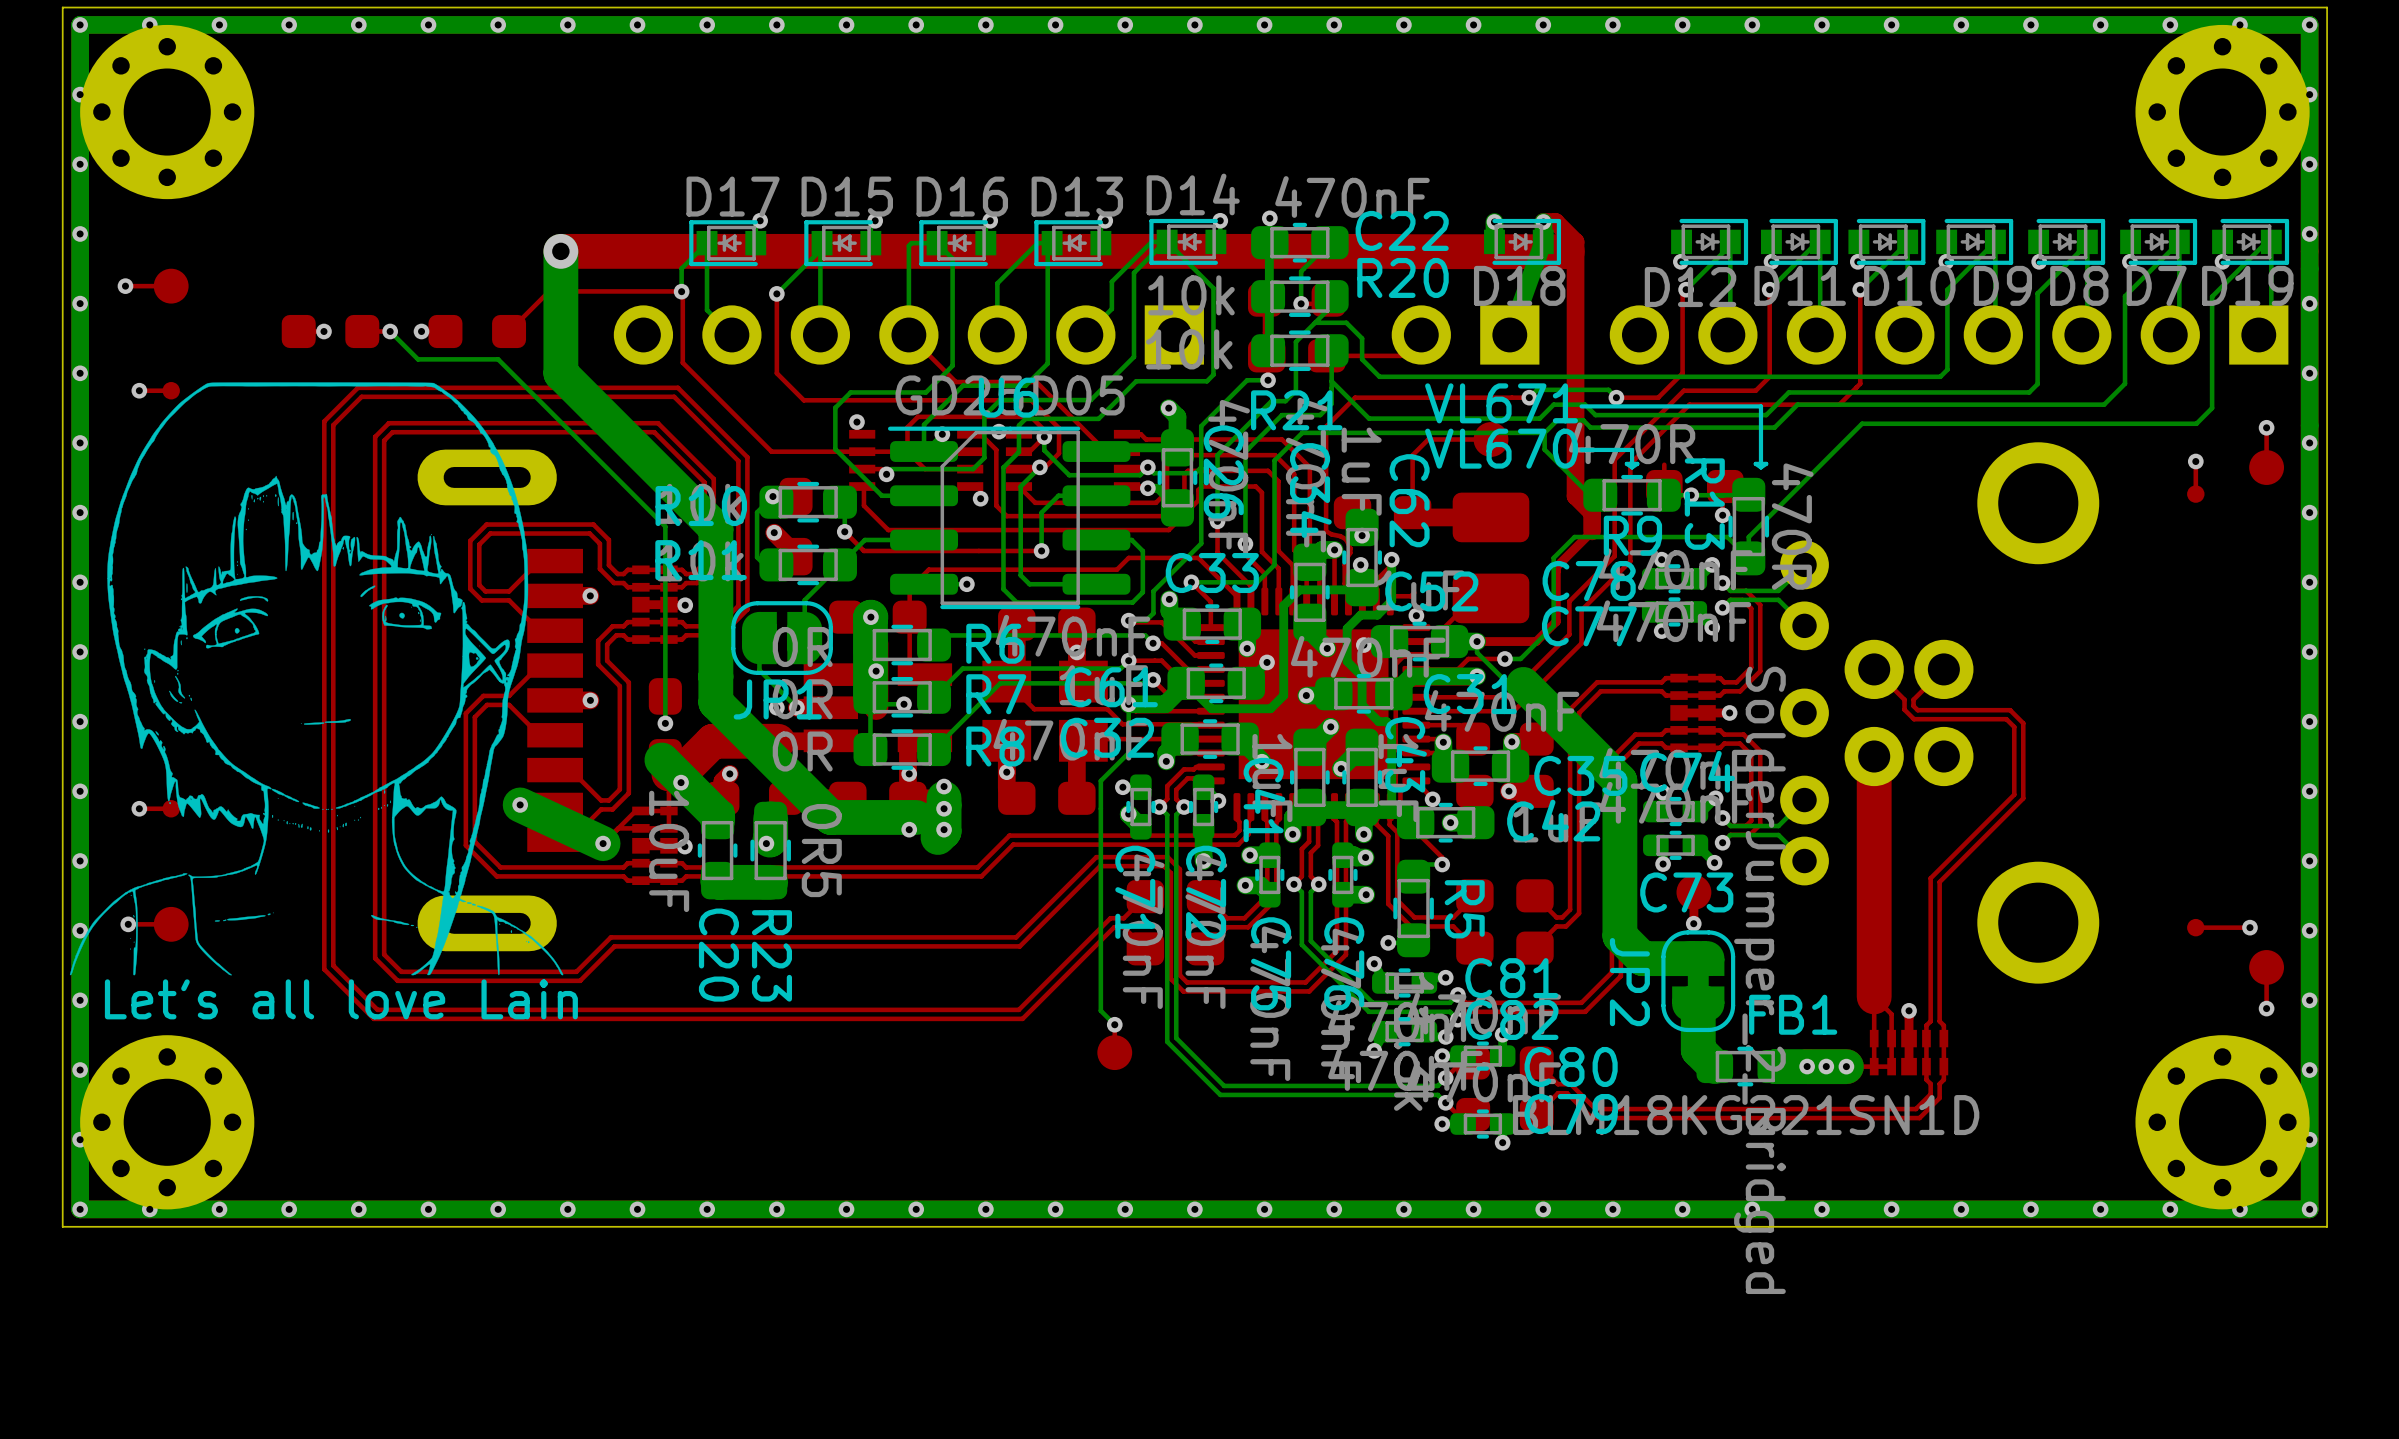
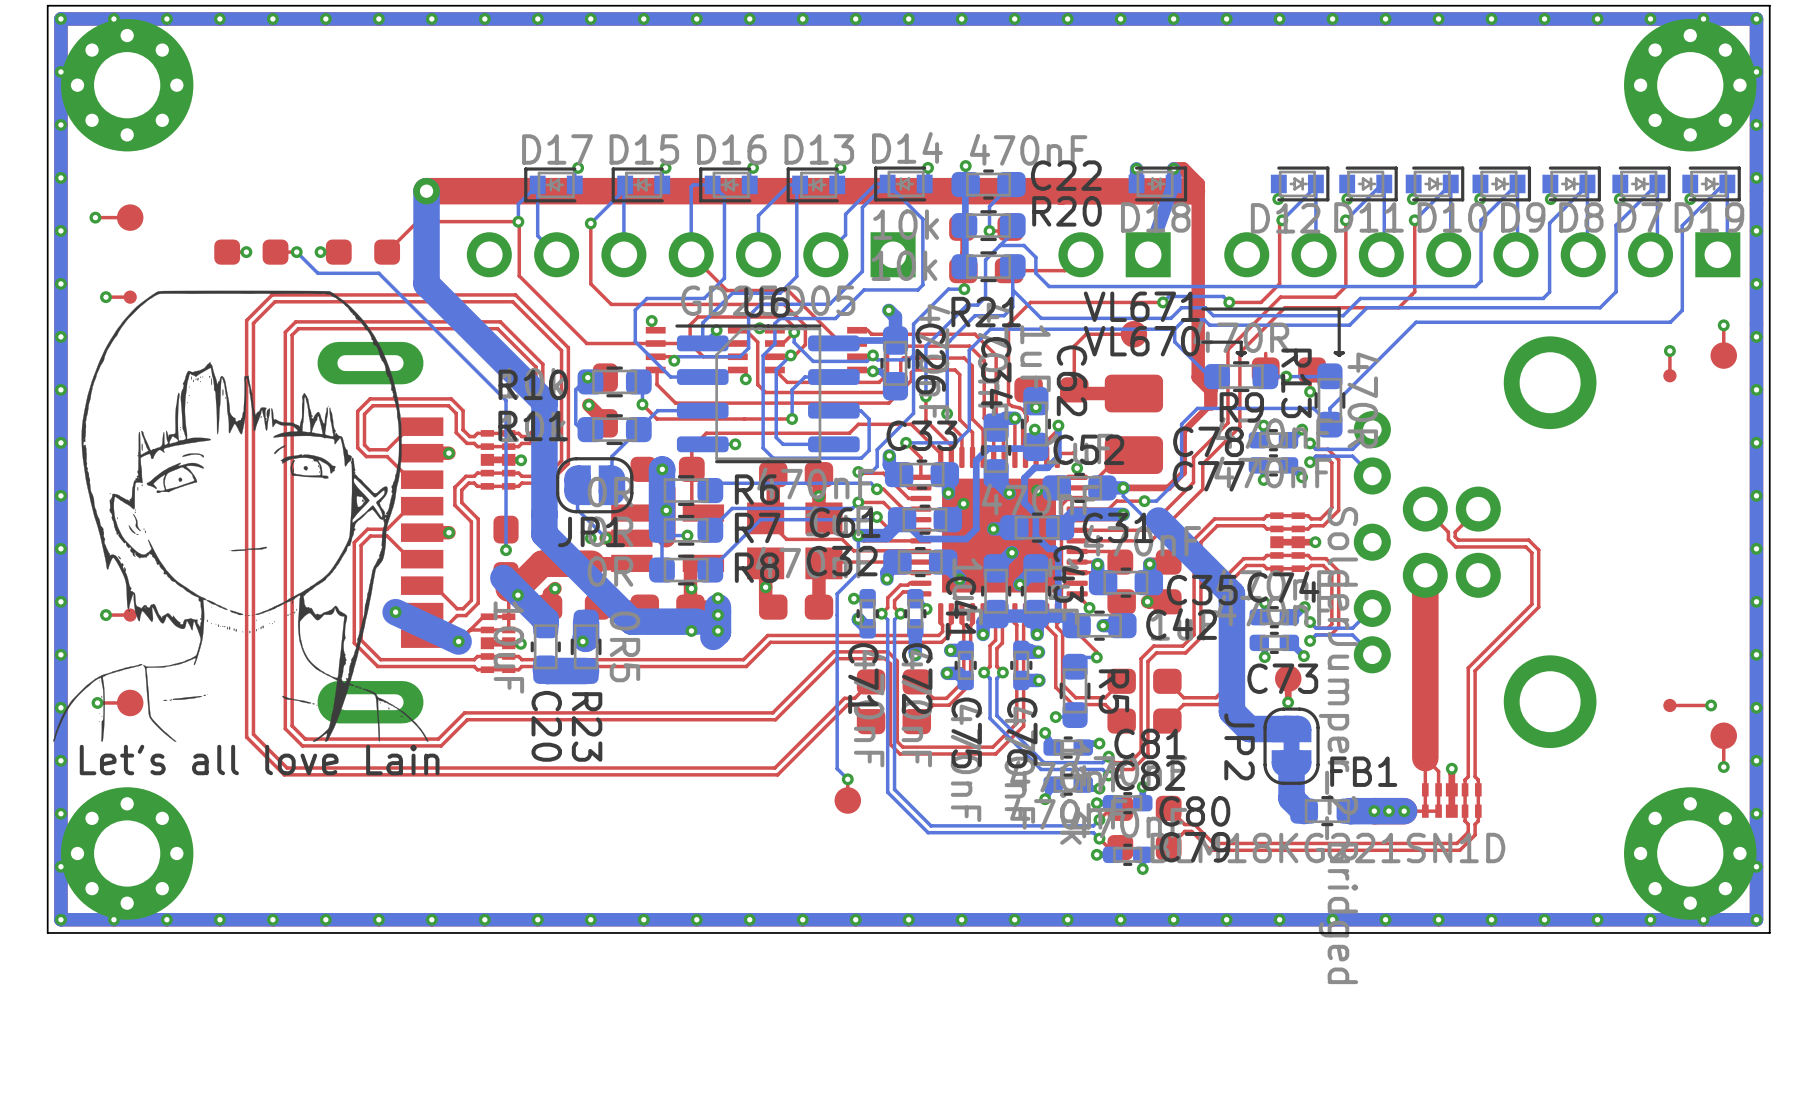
top track: (1570, 834) (1570, 909) (1562, 917) -> (1225, 687) (1215, 697) (1188, 697)
top track: (1579, 838) (1579, 913) (1566, 926) -> (1232, 690) (1218, 704) (1190, 704)
top track: (1611, 904) (1611, 972) (1581, 1002) (1485, 1002) -> (1194, 634) (1182, 646) (1153, 646) (1141, 658) (1141, 751) (1129, 762)
top track: (1620, 908) (1620, 976) (1585, 1011) (1489, 1011) -> (1200, 637) (1185, 652) (1156, 652) (1147, 661) (1147, 754) (1132, 769)

